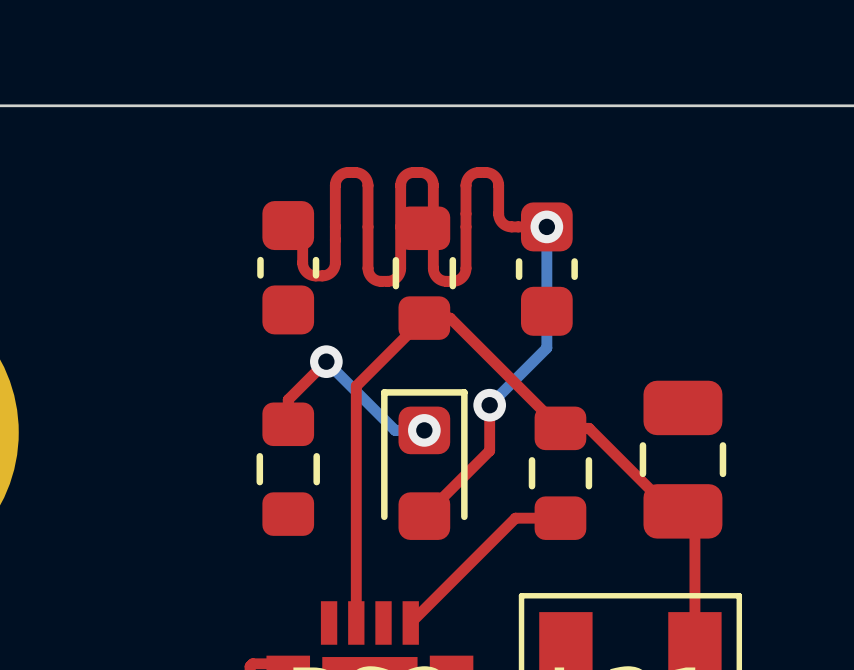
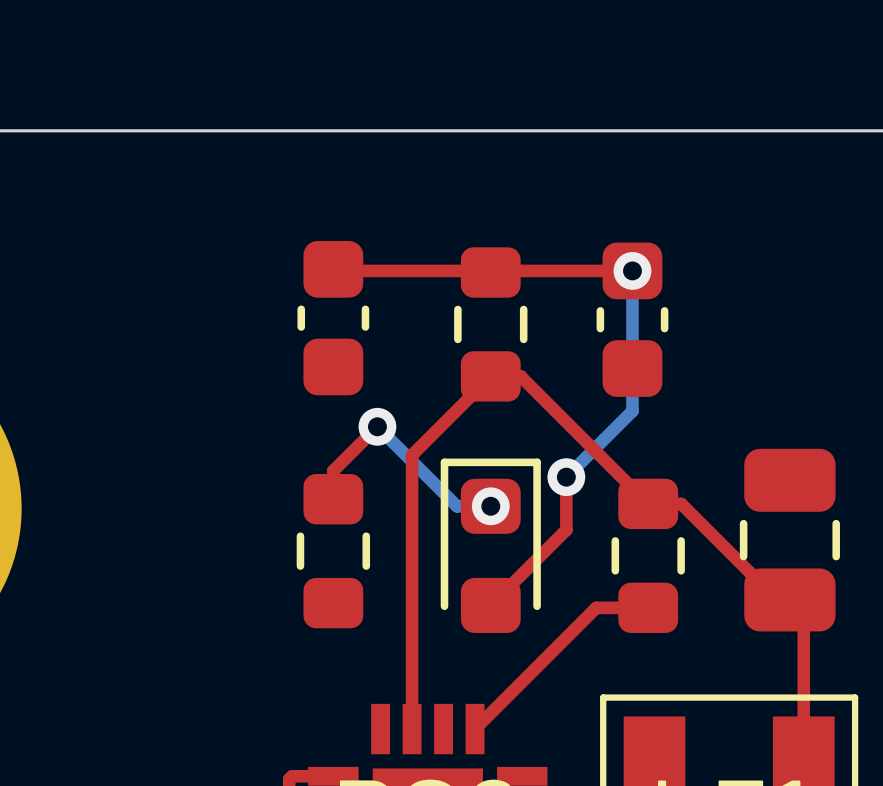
top track: (289, 226) (296, 228) (301, 235) (302, 264) (305, 270) (314, 275) (325, 275) (330, 273) (335, 264) (336, 181) (340, 175) (345, 172) (361, 174) (367, 184) (368, 271) (372, 278) (381, 281) (393, 280) (400, 271) (400, 184) (402, 178) (408, 173) (424, 173) (432, 181) (433, 269) (435, 275) (440, 280) (457, 280) (465, 272) (466, 184) (470, 175) (476, 172) (487, 172) (495, 177) (498, 184) (499, 218) (503, 224) (511, 226) -> (334, 270) (591, 270)

